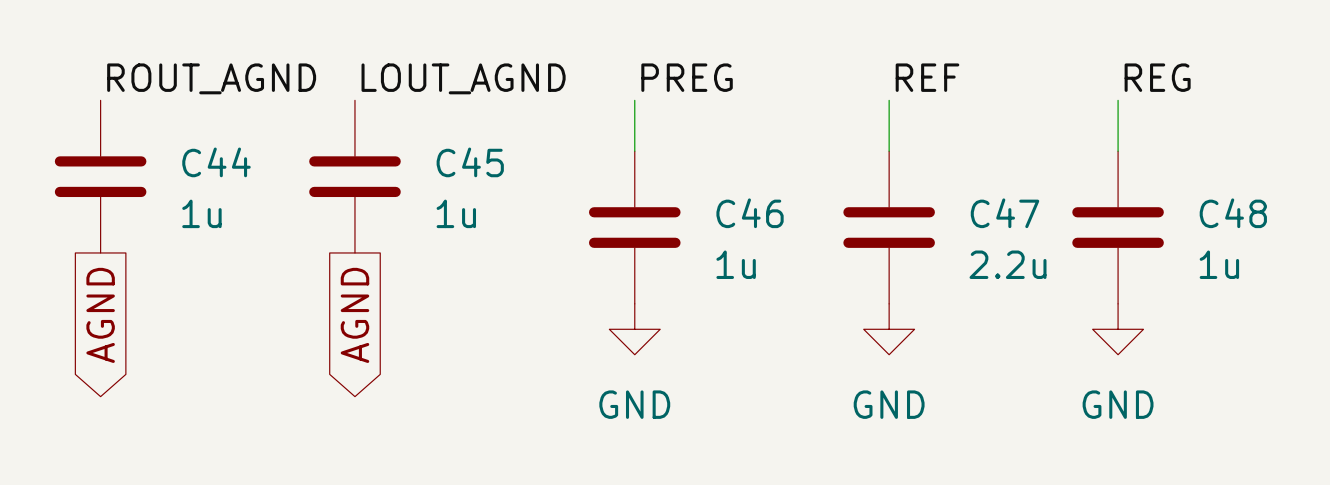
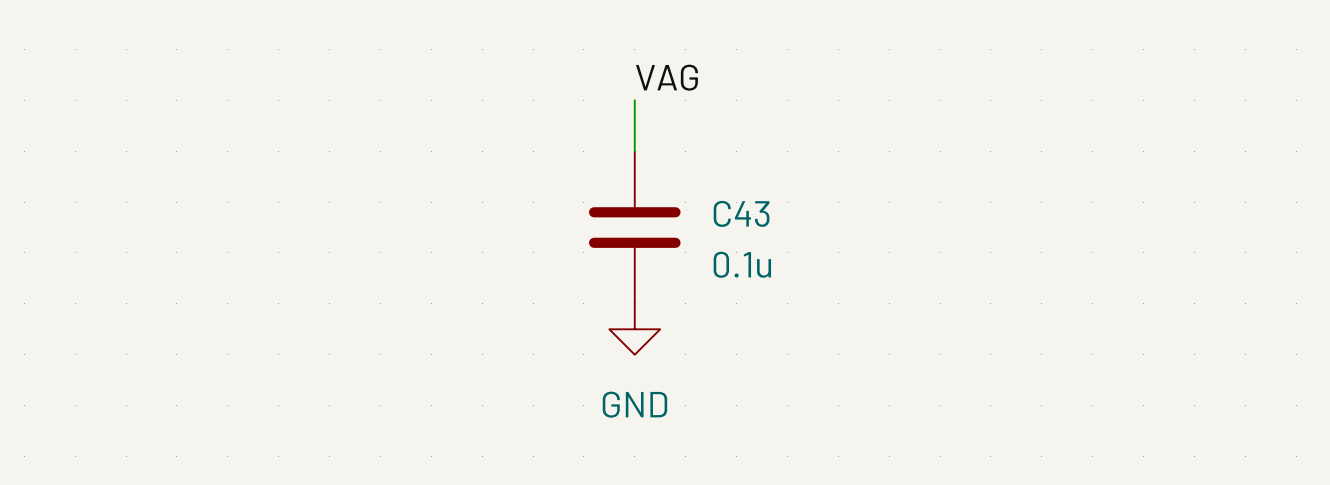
label: PREG (687, 77) -> VAG (666, 77)
label: REF (927, 77) -> none
label: REG (1157, 77) -> none
label: ROUT_AGND (211, 78) -> none
label: LOUT_AGND (463, 78) -> none
wire: (889, 100) (889, 151) -> none
wire: (1118, 100) (1118, 151) -> none
C44: 1u (100, 176) -> none
C45: 1u (354, 176) -> none
C46 name: C46 (750, 213) -> C43 (741, 213)
C47: 2.2u (889, 227) -> none
C48: 1u (1118, 227) -> none
C46 value: 1u (736, 264) -> 0.1u (742, 264)
global label: AGND (100, 315) -> none
global label: AGND (354, 315) -> none
power symbol: GND (889, 329) -> none
power symbol: GND (1118, 329) -> none

